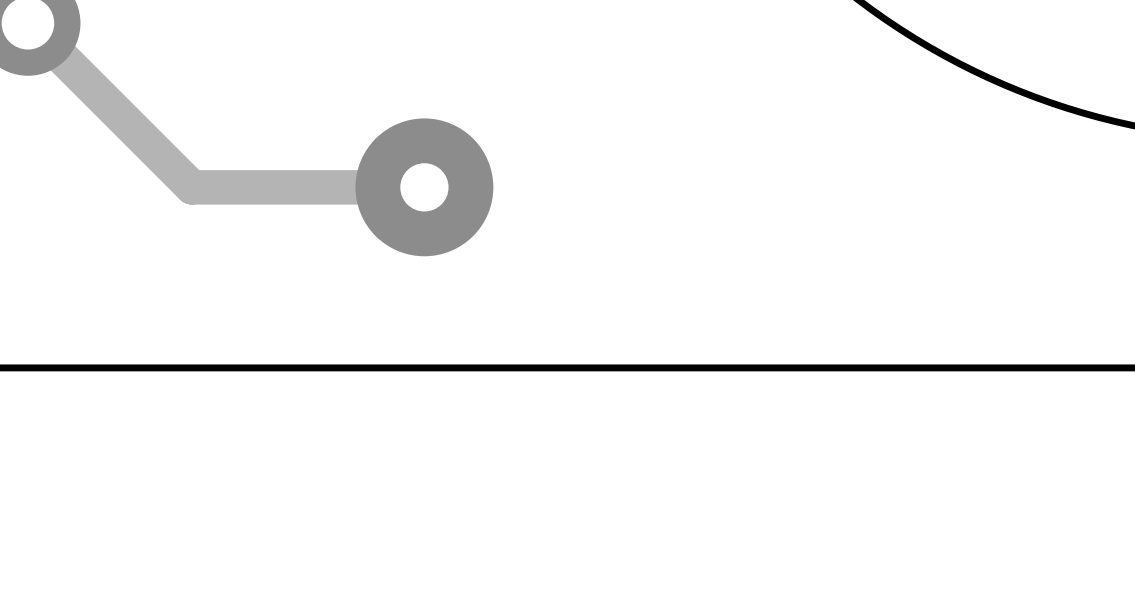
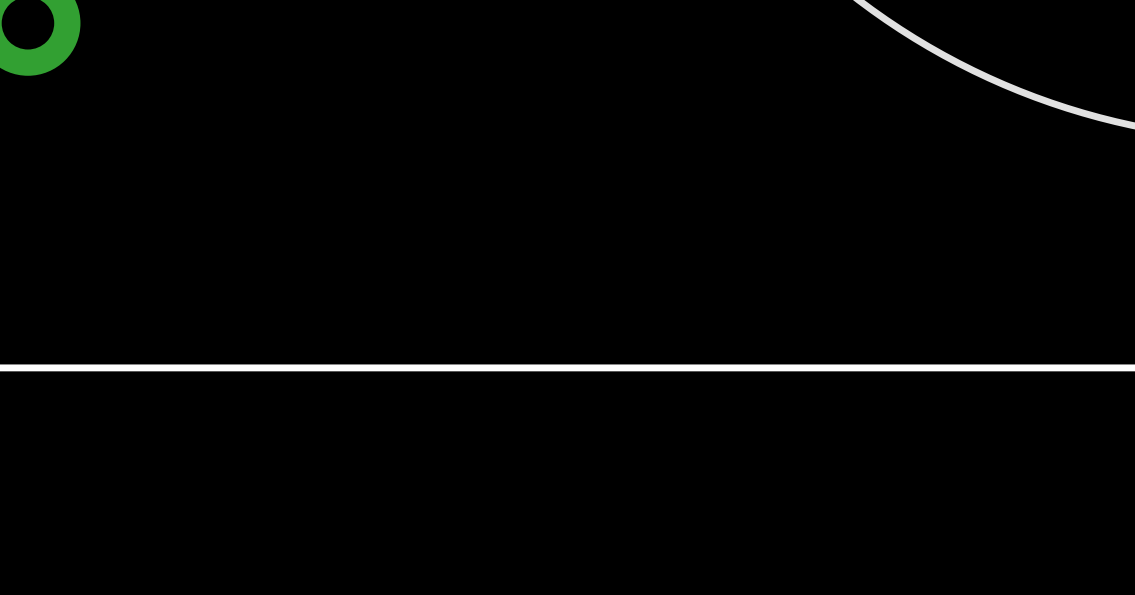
track: (27, 23) (192, 187) (424, 187) -> none
via: (424, 187) -> none

